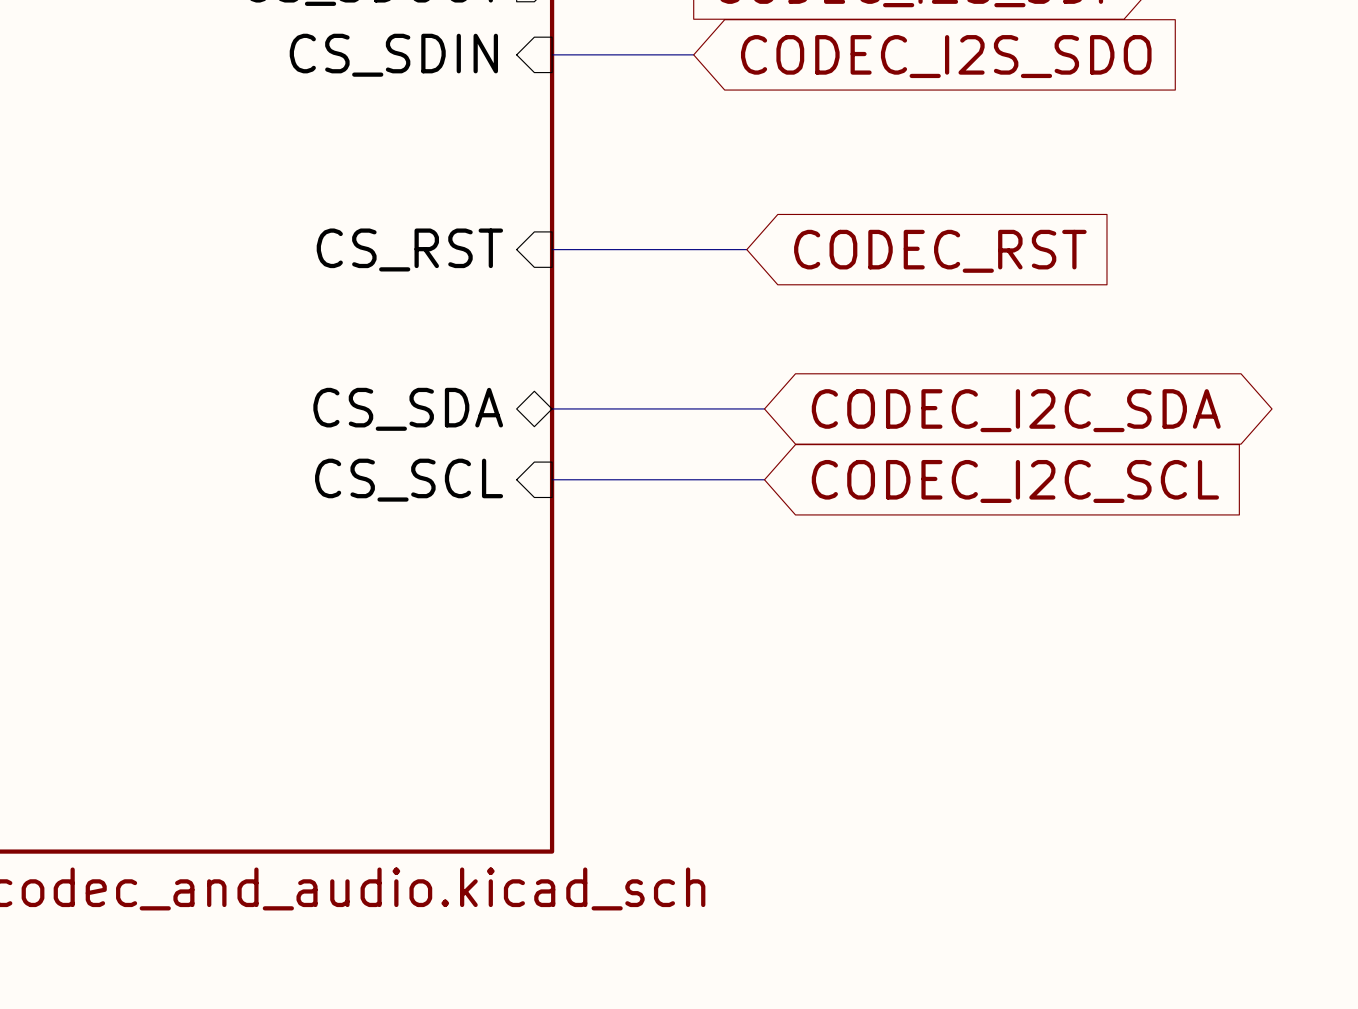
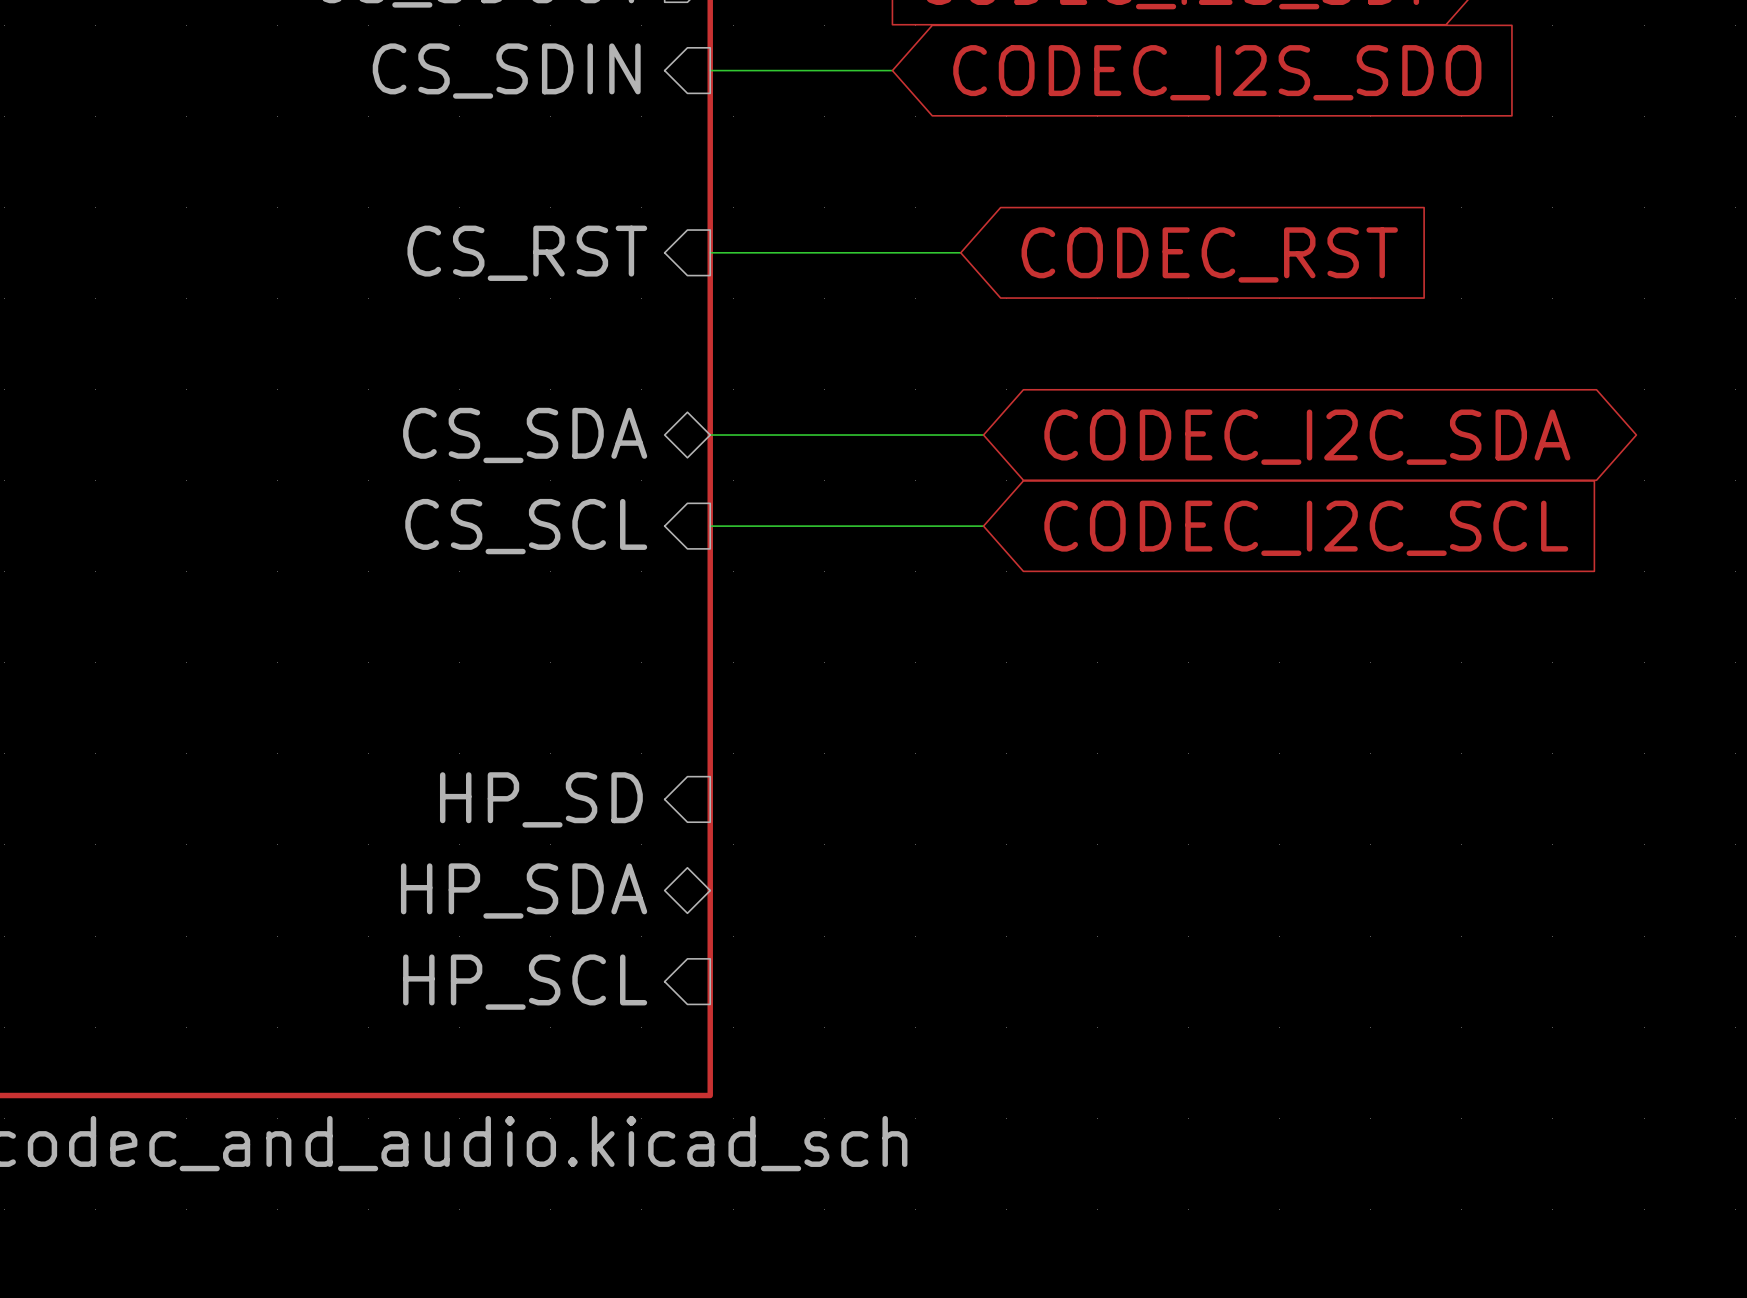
sheet pin position: CS_RST (409, 249) -> CS_RST (527, 253)
wire: (552, 249) (746, 249) -> (710, 252) (960, 252)
global label position: CODEC_RST (940, 251) -> CODEC_RST (1209, 254)
sheet pin: none -> CS_SDA (525, 435)
global label: none -> CODEC_I2C_SDA (1307, 437)
sheet pin shape: bidirectional (408, 409) -> input (526, 526)
sheet pin: CS_SDA (408, 409) -> CS_SCL (526, 526)
global label shape: bidirectional (1016, 410) -> input (1306, 528)
global label: CODEC_I2C_SDA (1016, 410) -> CODEC_I2C_SCL (1306, 528)
wire: (552, 479) (764, 479) -> (710, 435) (983, 435)
sheet pin: CS_SCL (409, 480) -> none
global label: CODEC_I2C_SCL (1015, 481) -> none
sheet pin: none -> HP_SD (541, 799)
sheet pin: none -> HP_SDA (524, 891)
sheet pin: none -> HP_SCL (525, 982)

